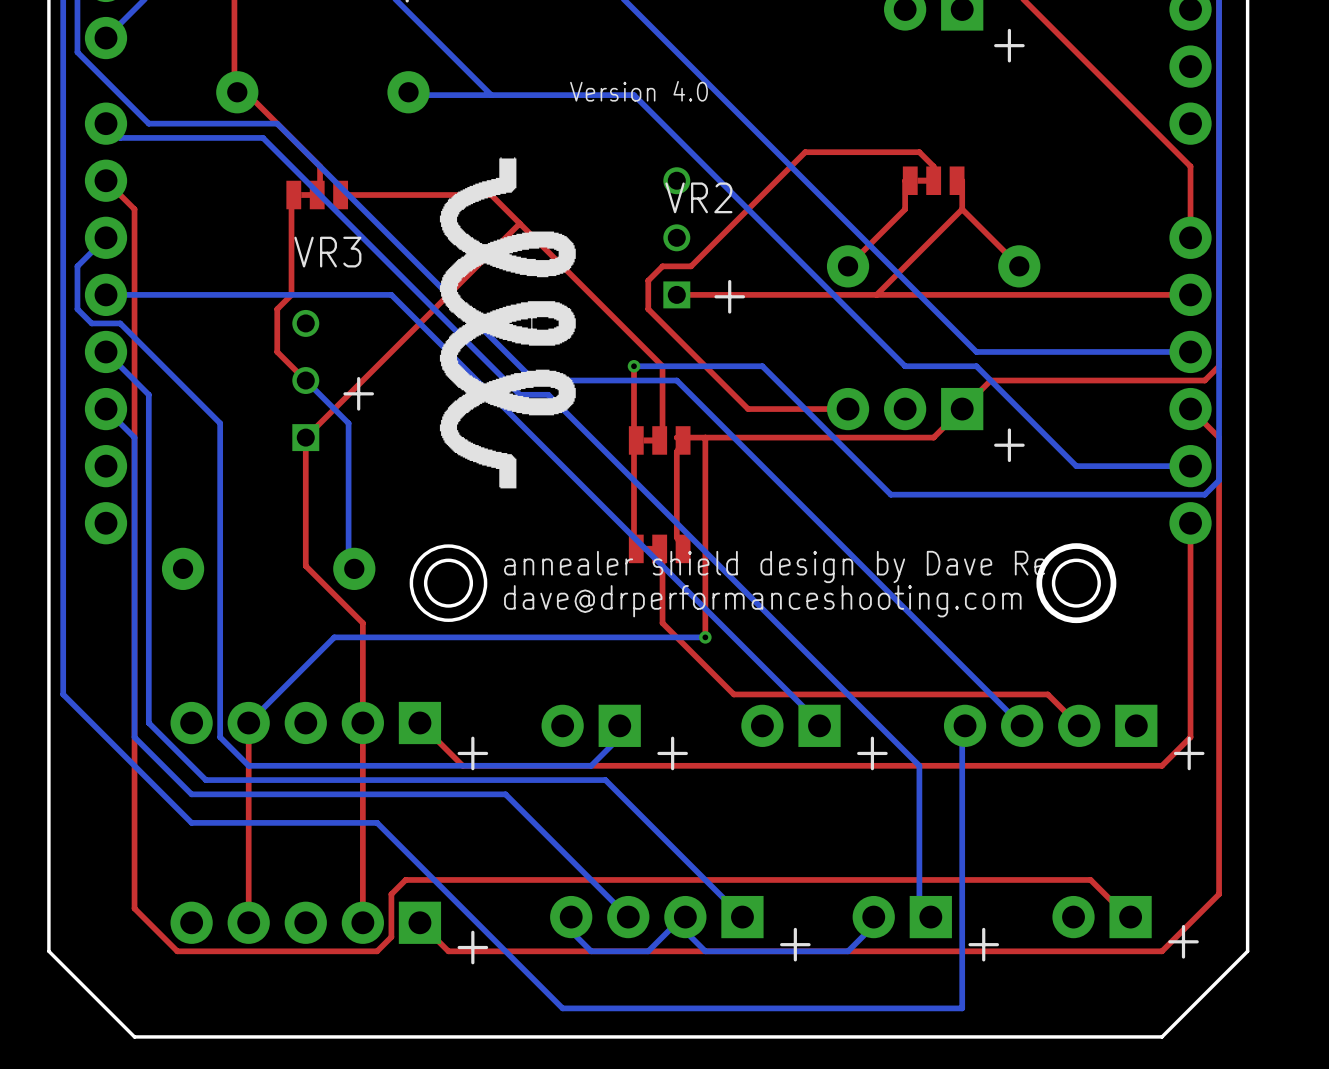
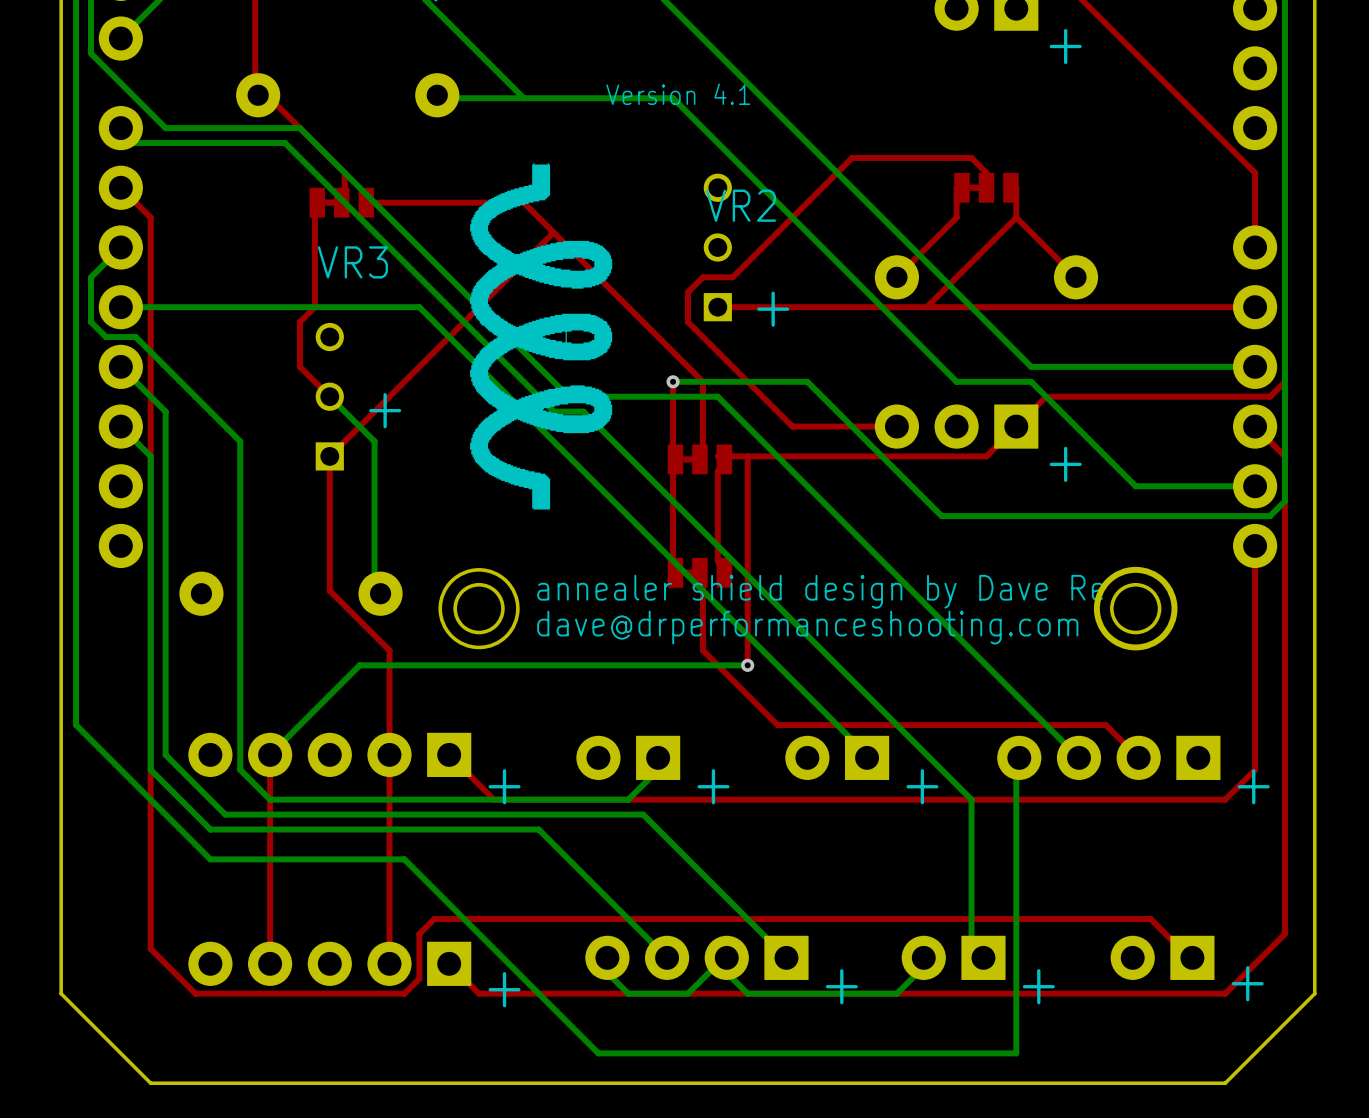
text: Version 4.0 (638, 91) -> Version 4.1 (678, 94)

